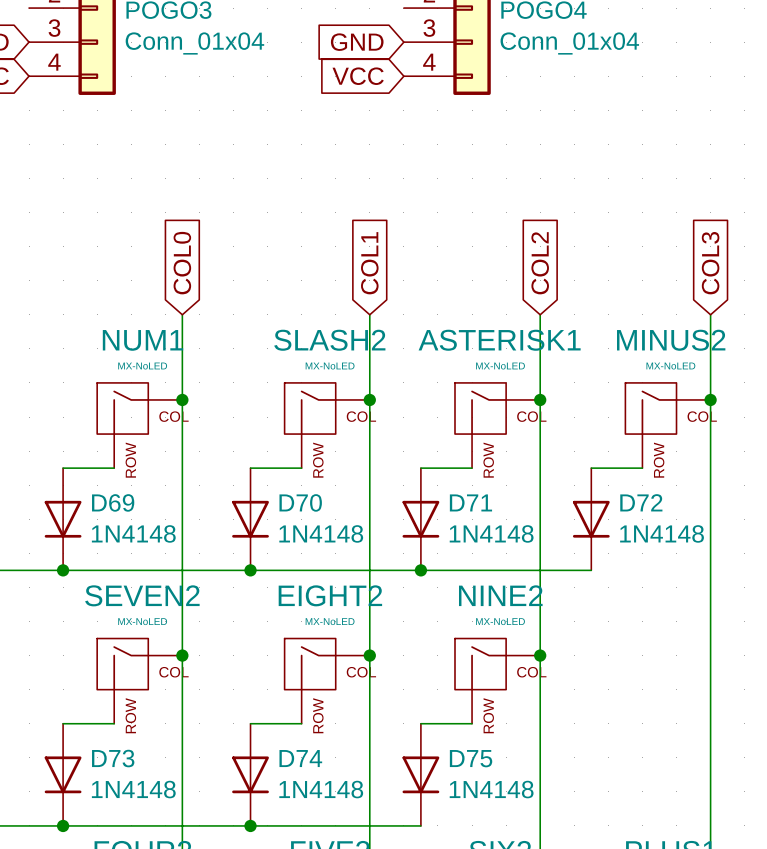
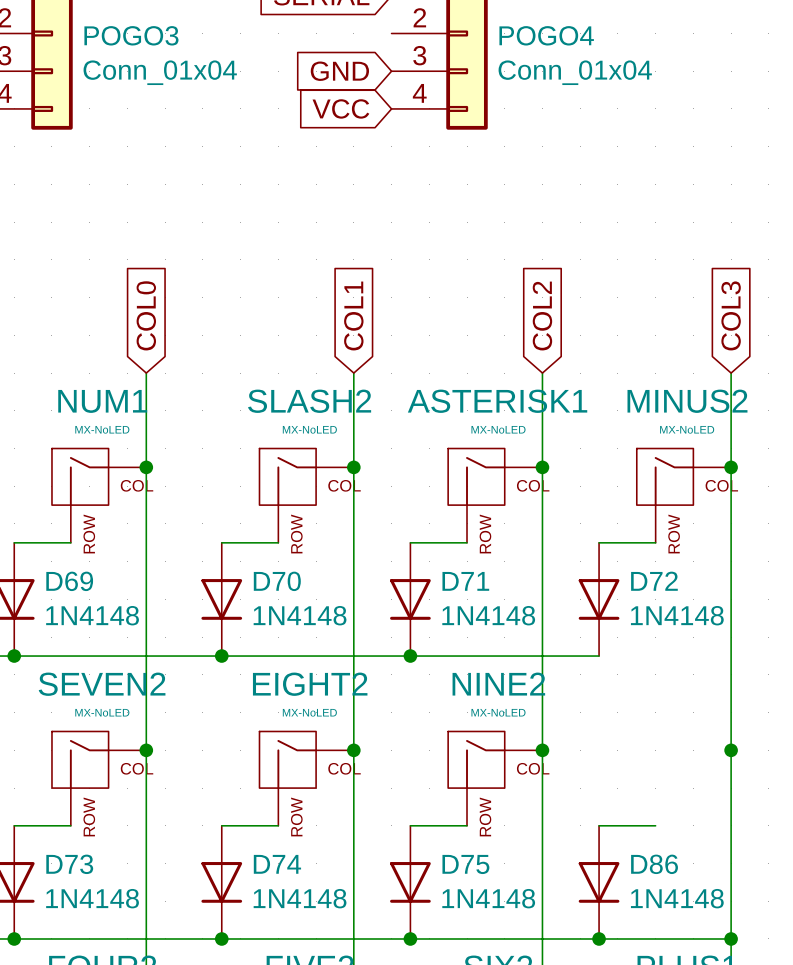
junction: none -> (731, 750)
wire: none -> (599, 825) (655, 825)
D86: none -> 1N4148 (599, 882)
wire: none -> (410, 938) (731, 938)
junction: none -> (410, 938)
junction: none -> (599, 938)
junction: none -> (731, 938)

